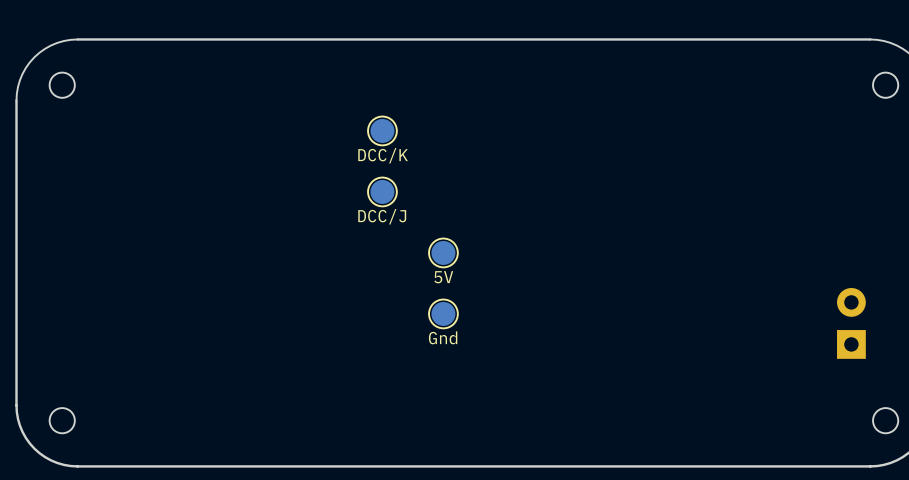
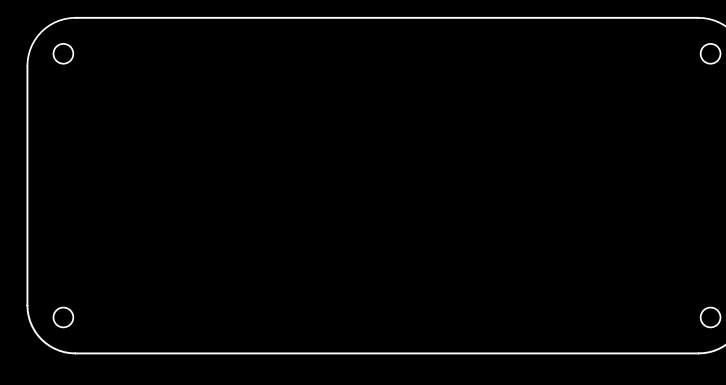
part: DCC/K (382, 130) -> none
part: DCC/J (382, 191) -> none
part: 5V (443, 252) -> none
part: Gnd (443, 313) -> none
part: (851, 323) -> none

